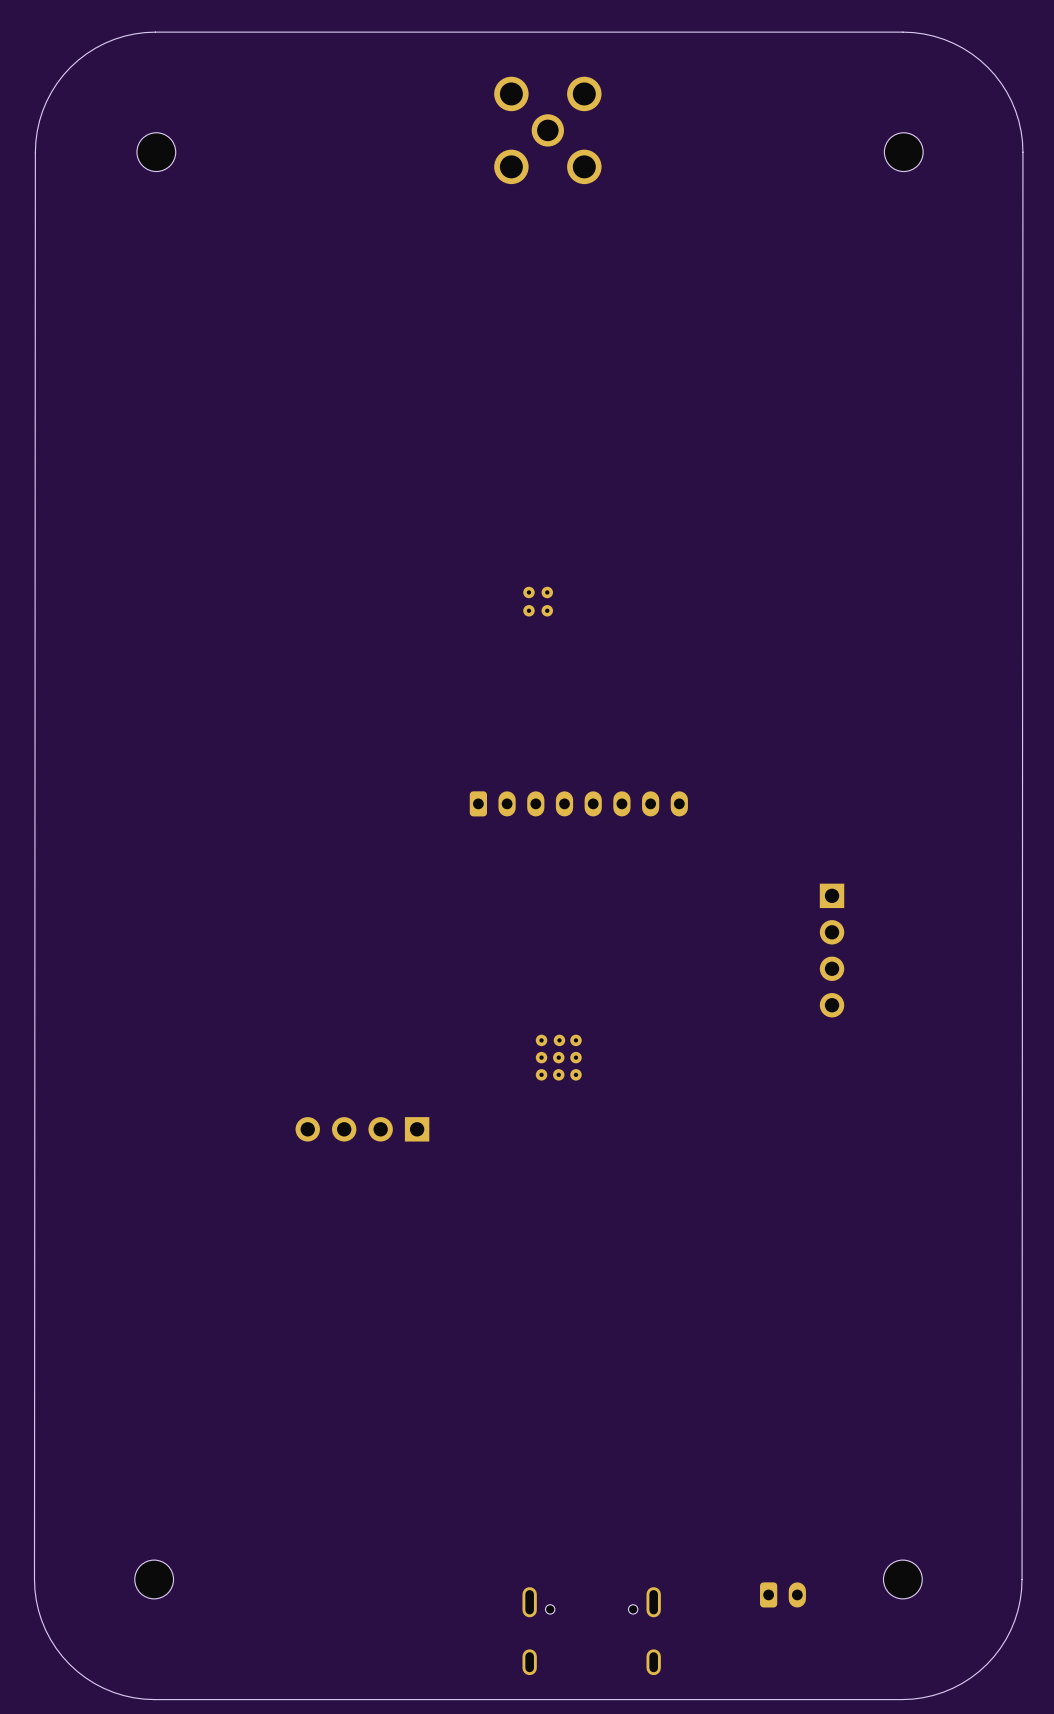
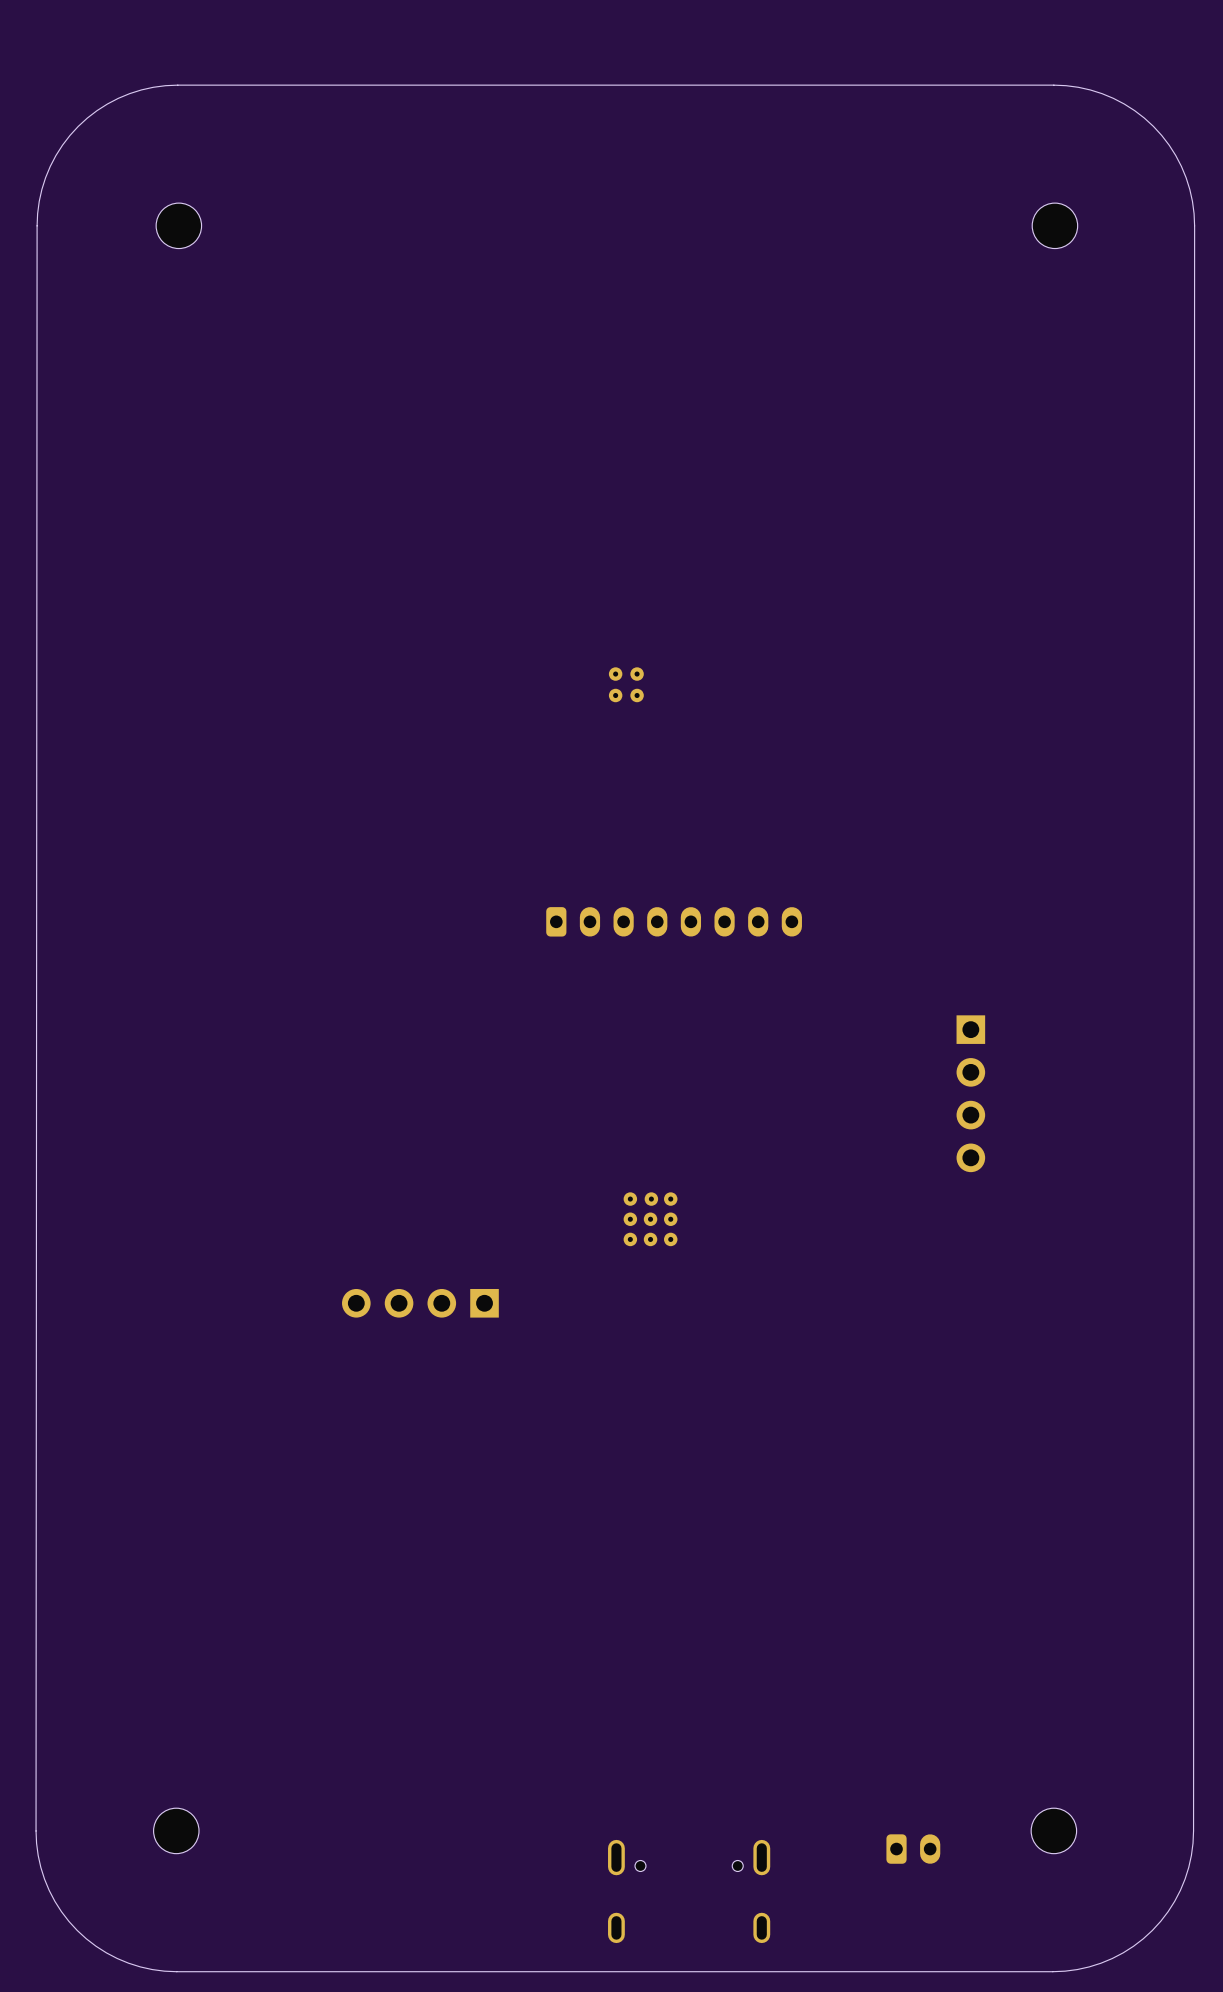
part: (547, 130) -> none
part position: (156, 152) -> (178, 225)
part position: (903, 152) -> (1054, 225)
board edge: (1022, 1579) (1022, 141) (1018, 121) (1006, 92) (994, 75) (980, 60) (962, 48) (943, 39) (923, 33) (902, 32) (144, 32) (114, 39) (95, 48) (70, 67) (51, 92) (39, 121) (35, 152) (34, 1579) -> (1193, 1830) (1194, 213) (1189, 189) (1181, 166) (1169, 145) (1153, 126) (1134, 110) (1113, 98) (1090, 89) (1053, 85) (165, 85) (129, 93) (107, 104) (78, 126) (55, 155) (41, 189) (37, 225) (36, 1830)

